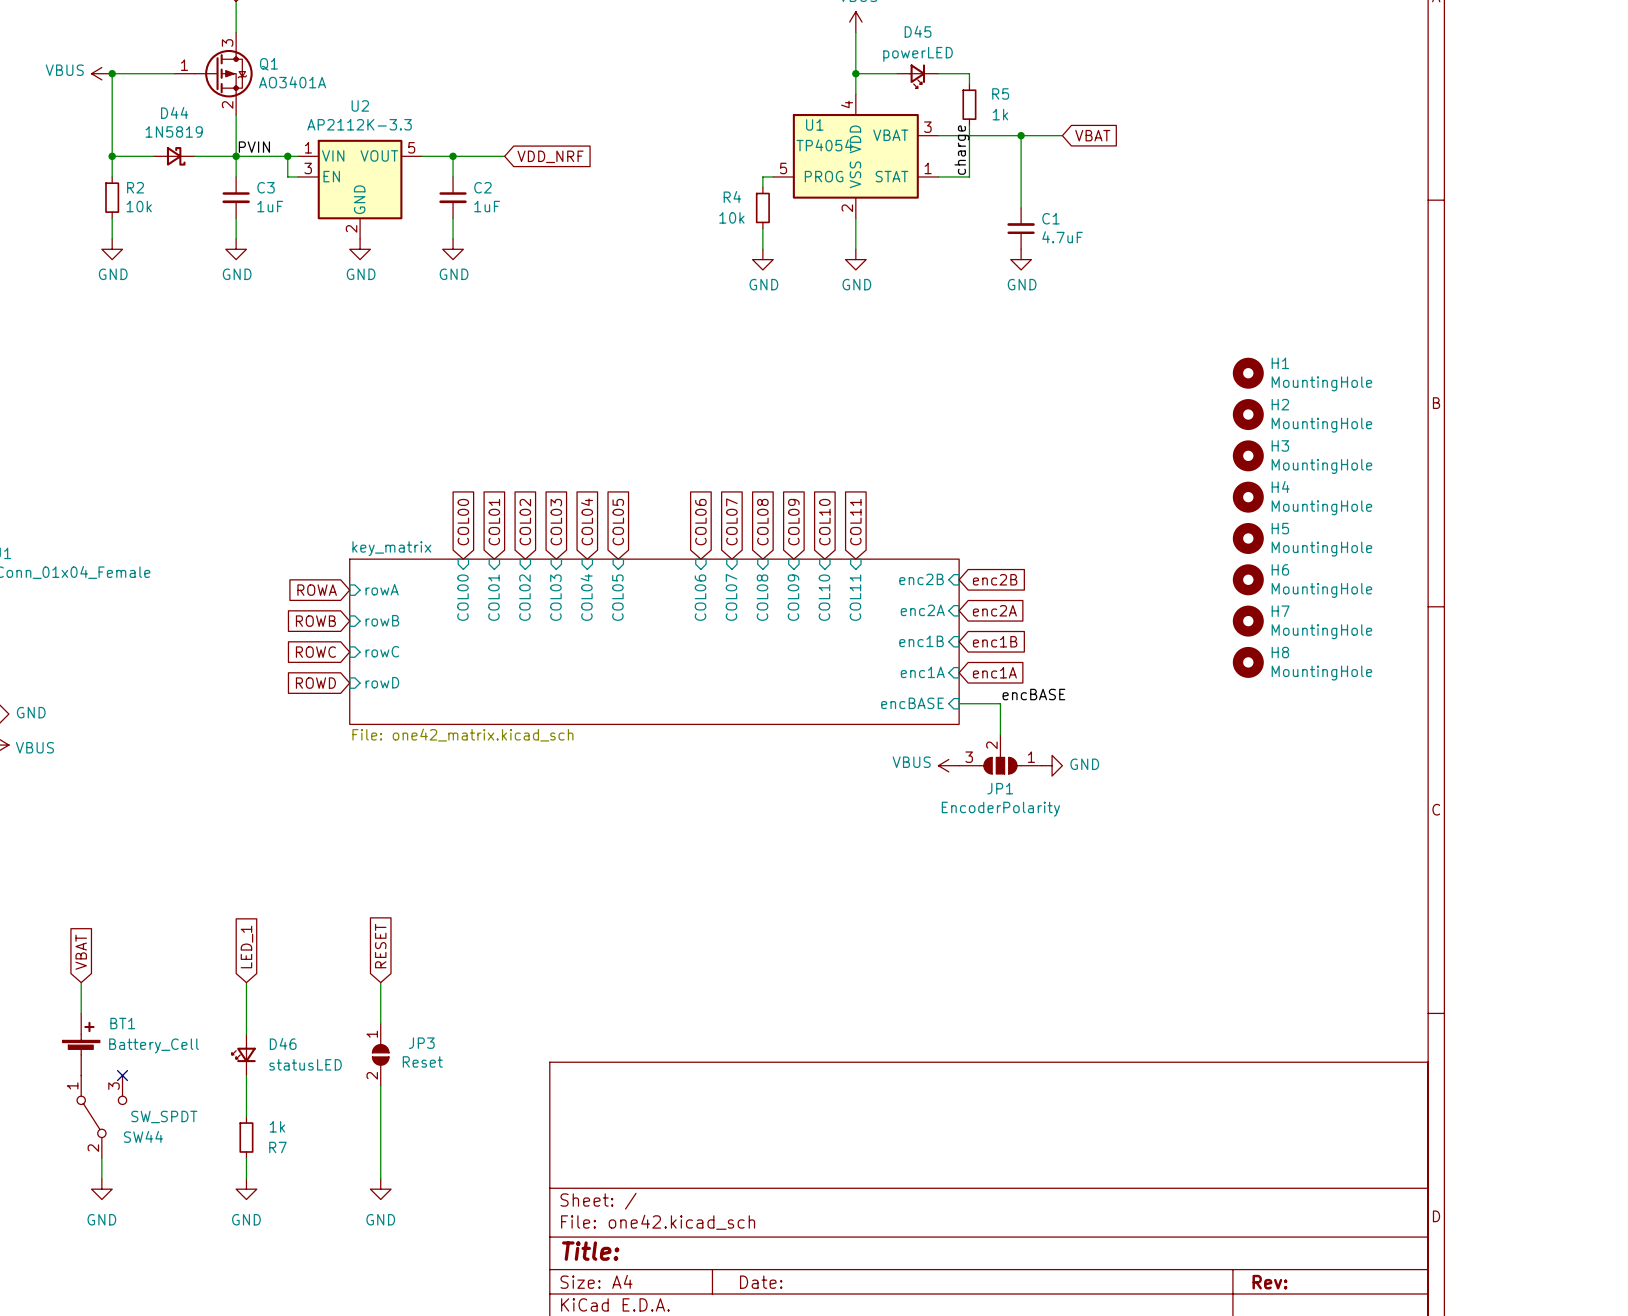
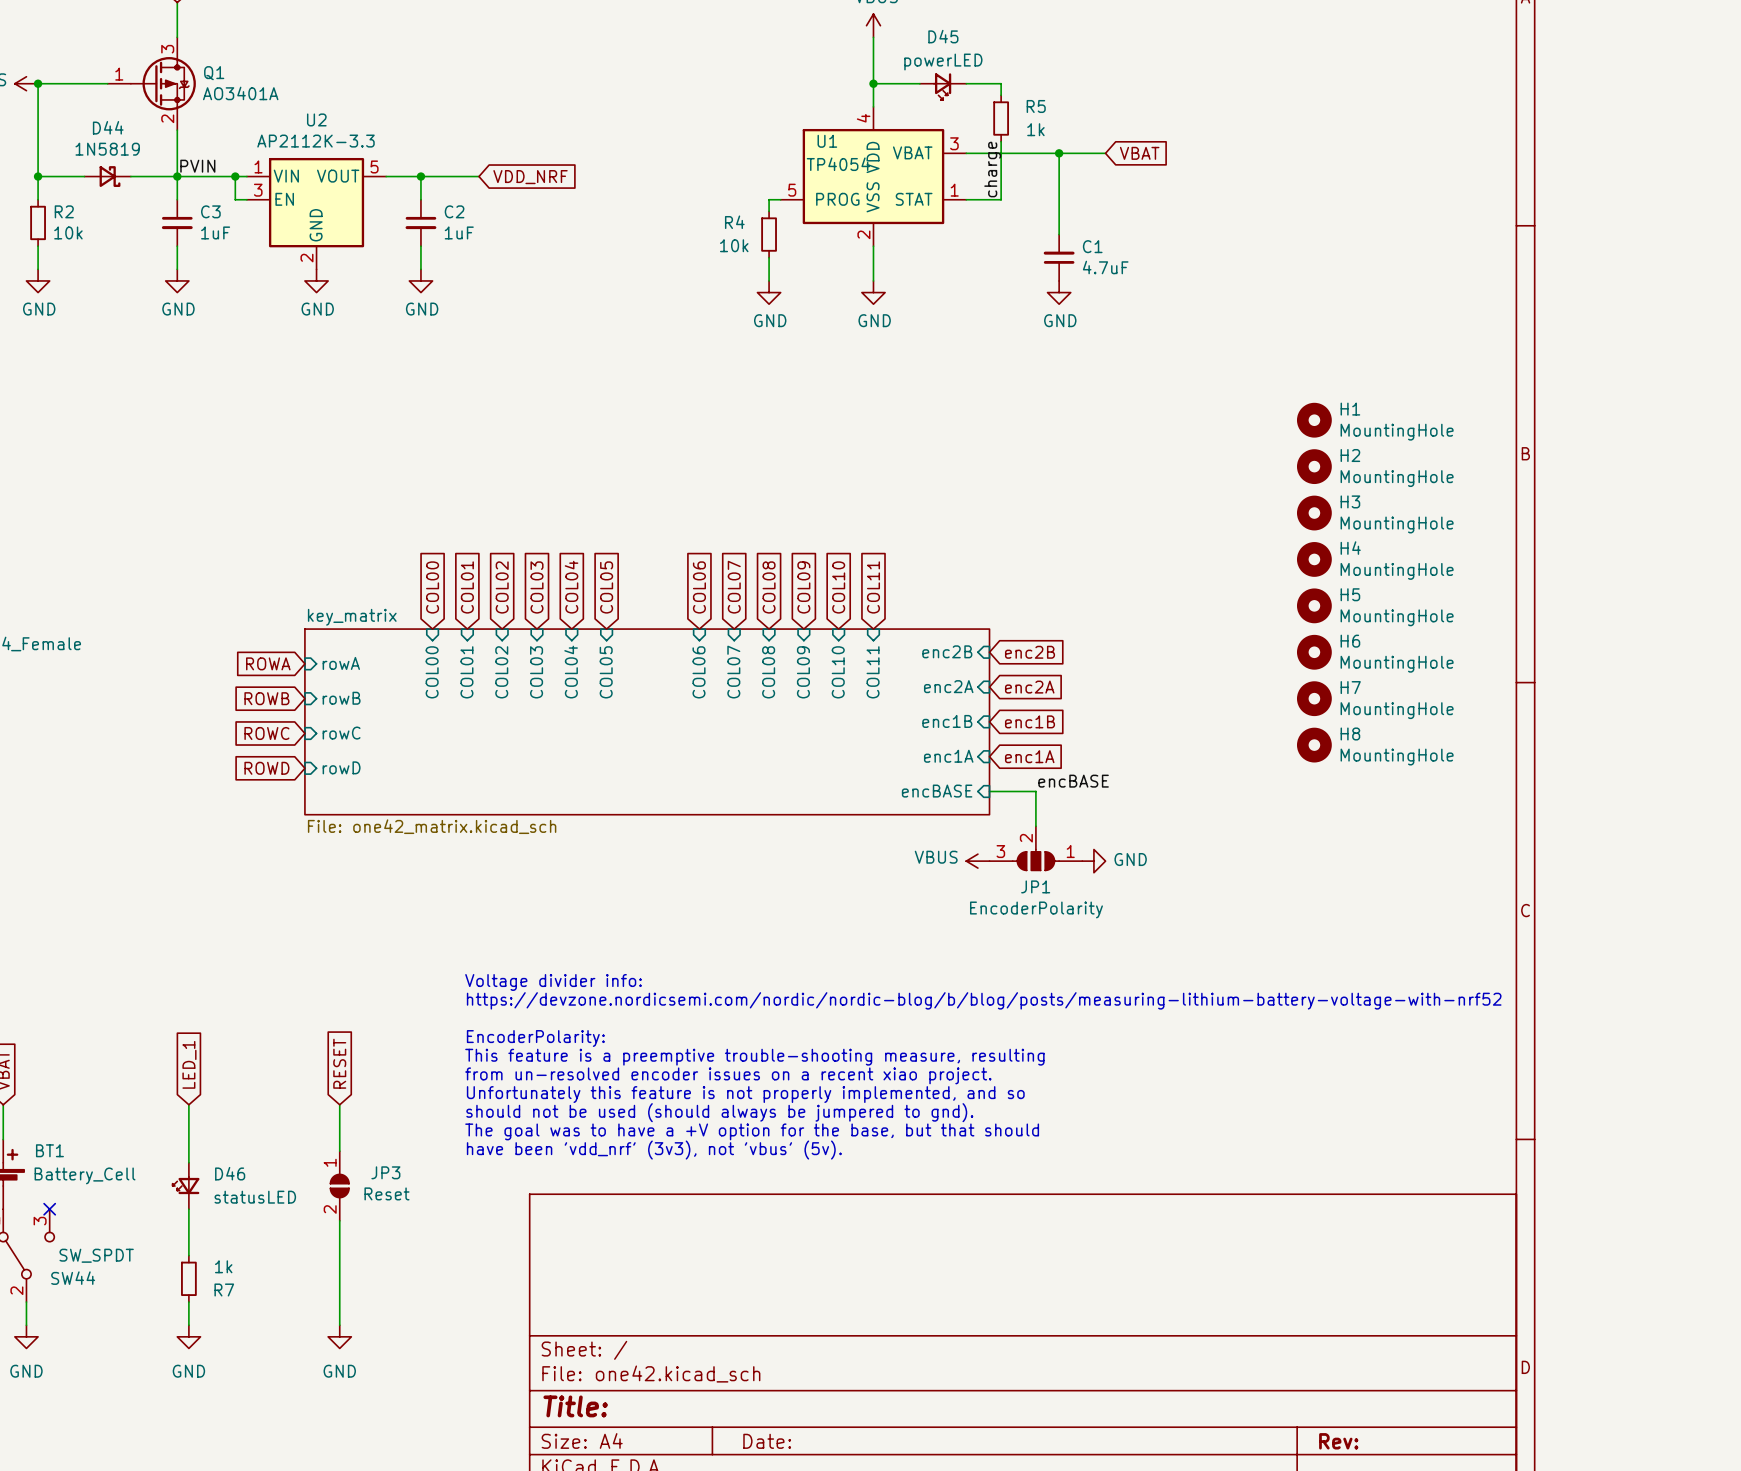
text: none -> Voltage divider info: (553, 982)
text: none -> https://devzone.nordicsemi.com/nordic/nordic-blog/b/blog/posts/measuring-lithium-battery-voltage-with-nrf52 (984, 1000)
text: none -> EncoderPolarity: (535, 1038)
text: none -> This feature is a preemptive trouble-shooting measure, resulting (754, 1057)
text: none -> from un-resolved encoder issues on a recent xiao project. (728, 1075)
text: none -> Unfortunately this feature is not properly implemented, and so (745, 1094)
text: none -> should not be used (should always be jumpered to gnd). (719, 1112)
text: none -> The goal was to have a +V option for the base, but that should (752, 1131)
text: none -> have been 'vdd_nrf' (3v3), not 'vbus' (5v). (654, 1150)

